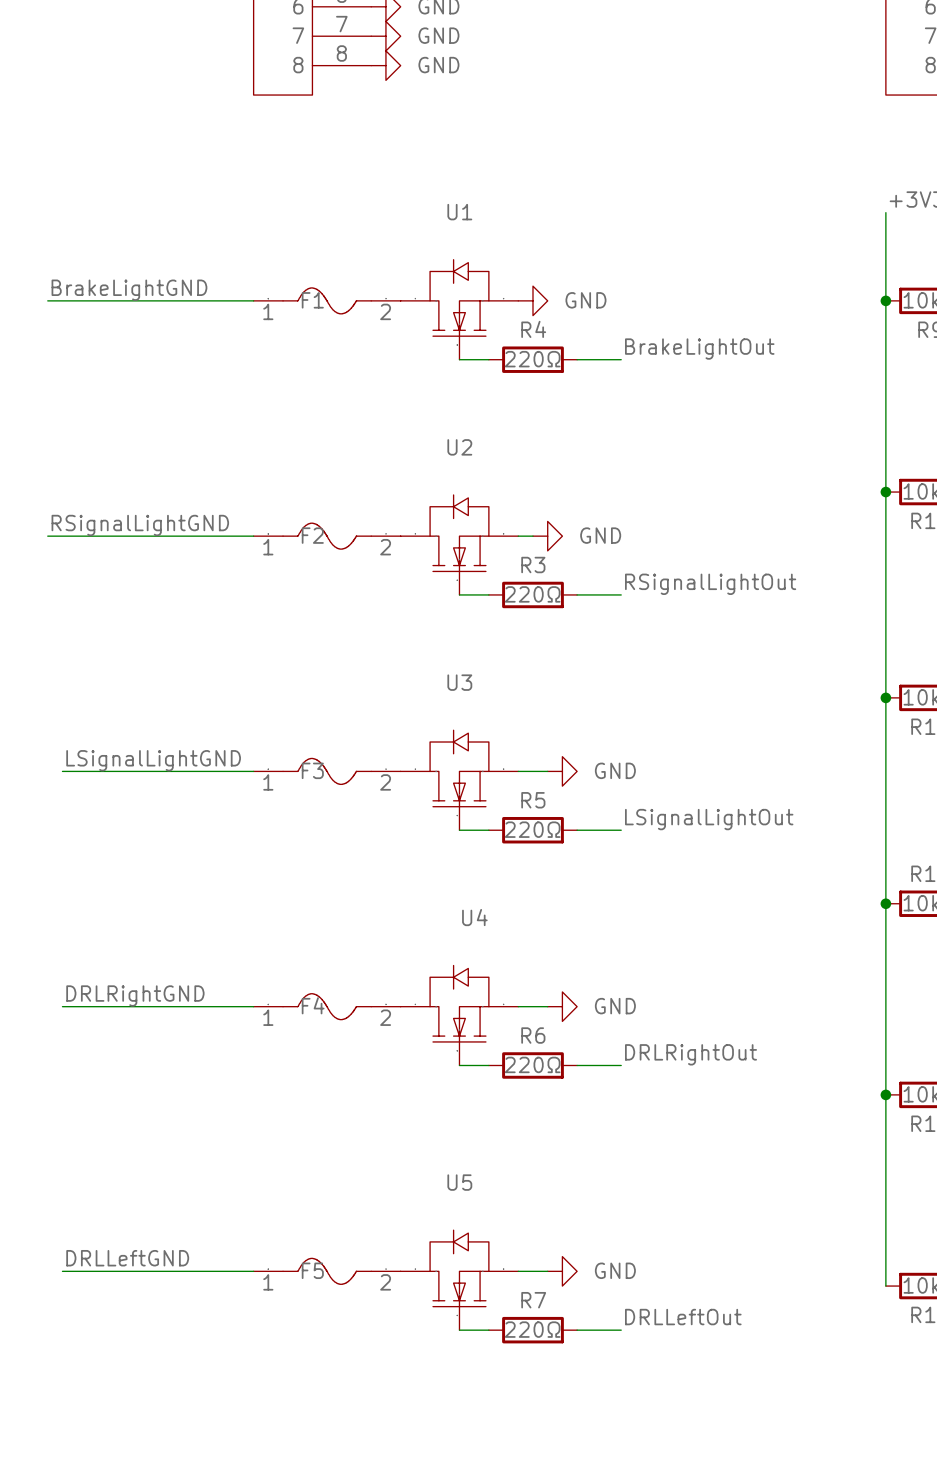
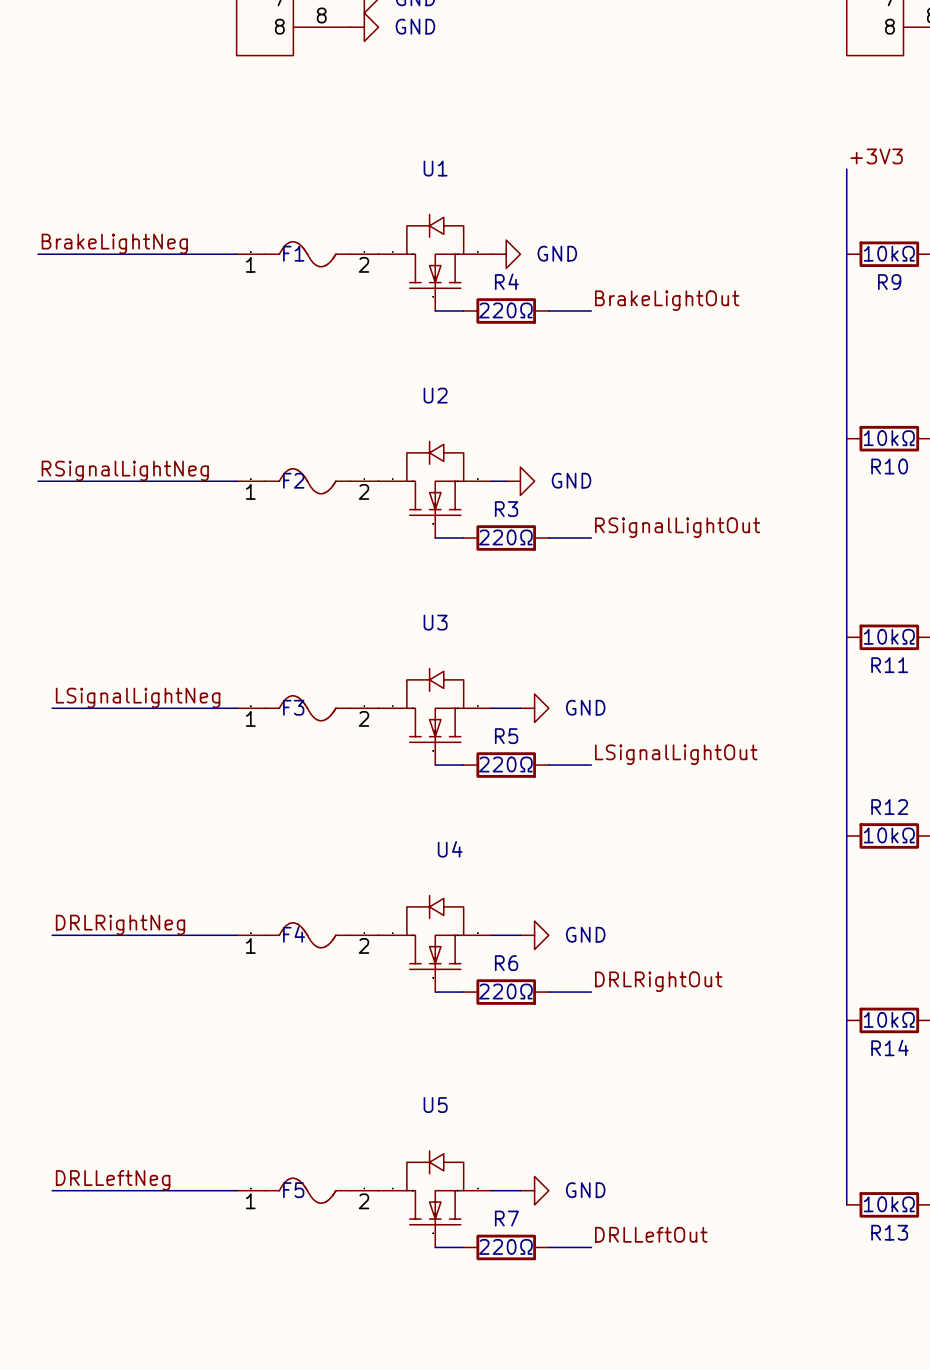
label: BrakeLightGND (129, 290) -> BrakeLightNeg (114, 243)
junction: (885, 300) -> none
junction: (885, 492) -> none
label: RSignalLightGND (140, 525) -> RSignalLightNeg (125, 470)
junction: (885, 697) -> none
label: LSignalLightGND (153, 760) -> LSignalLightNeg (138, 697)
junction: (885, 903) -> none
label: DRLRightGND (135, 996) -> DRLRightNeg (120, 925)
junction: (885, 1094) -> none
label: DRLLeftGND (127, 1258) -> DRLLeftNeg (113, 1180)

